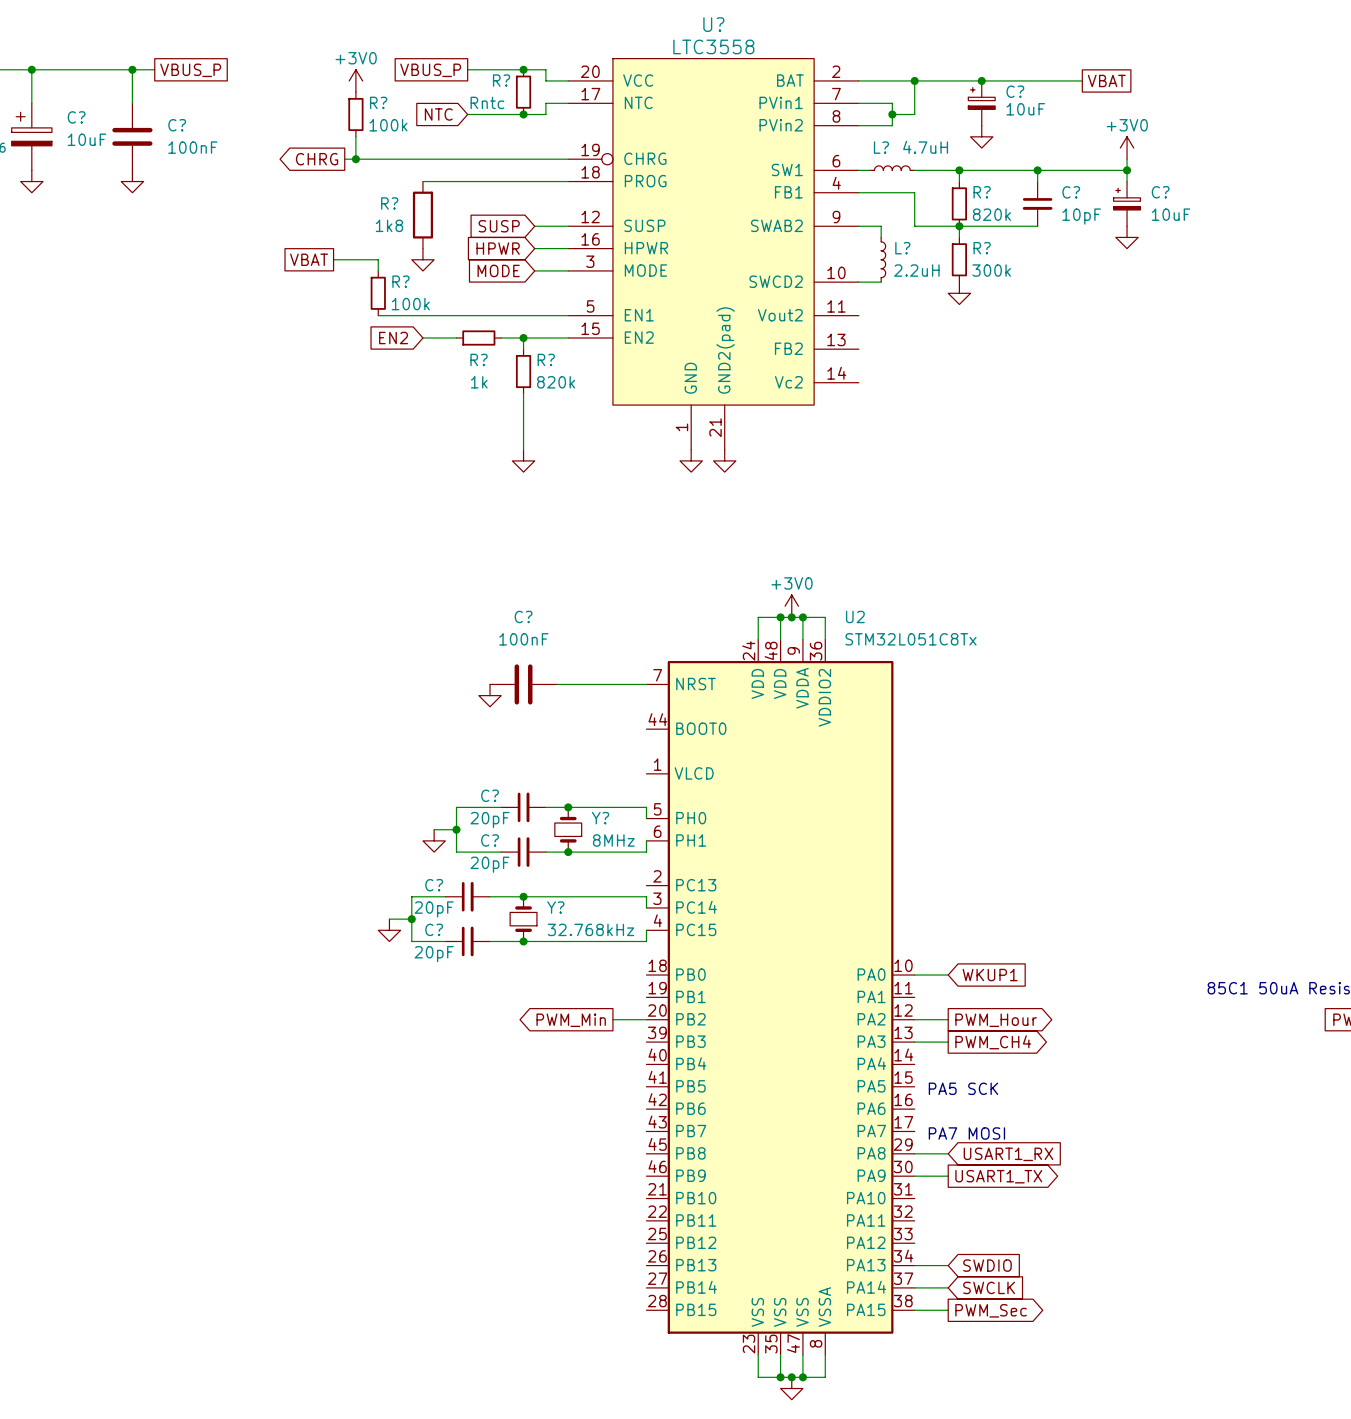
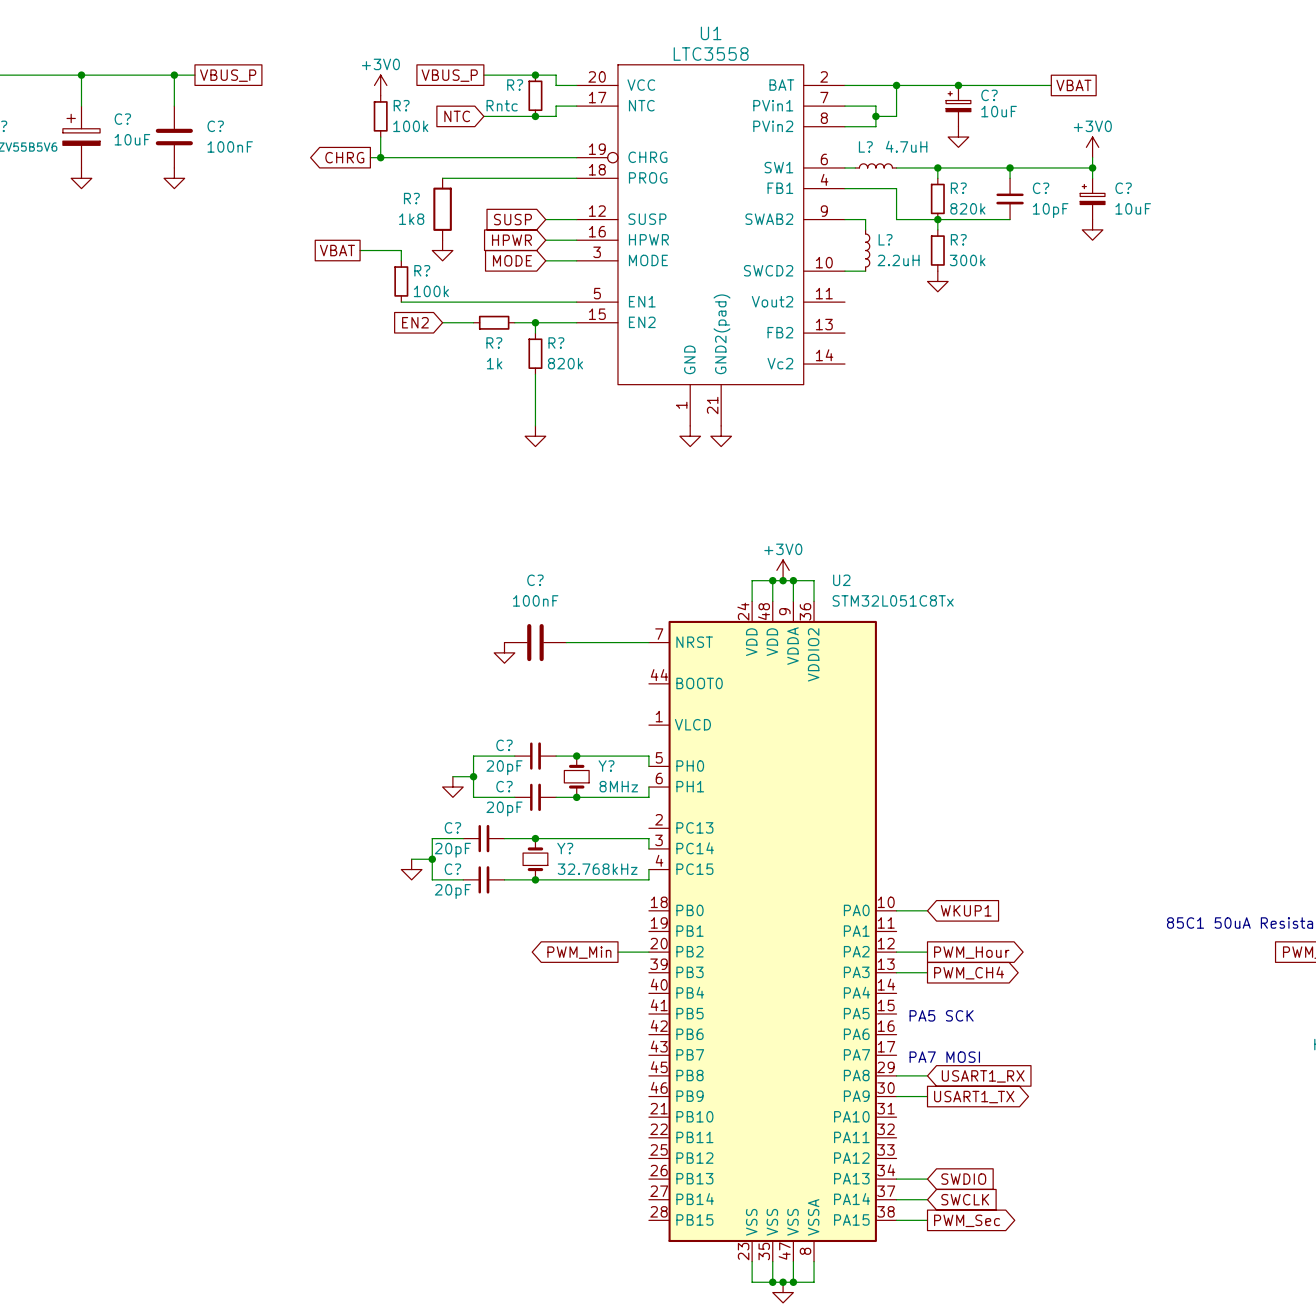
U?: LTC3558 (713, 254) -> none
U1: none -> LTC3558 (710, 245)

